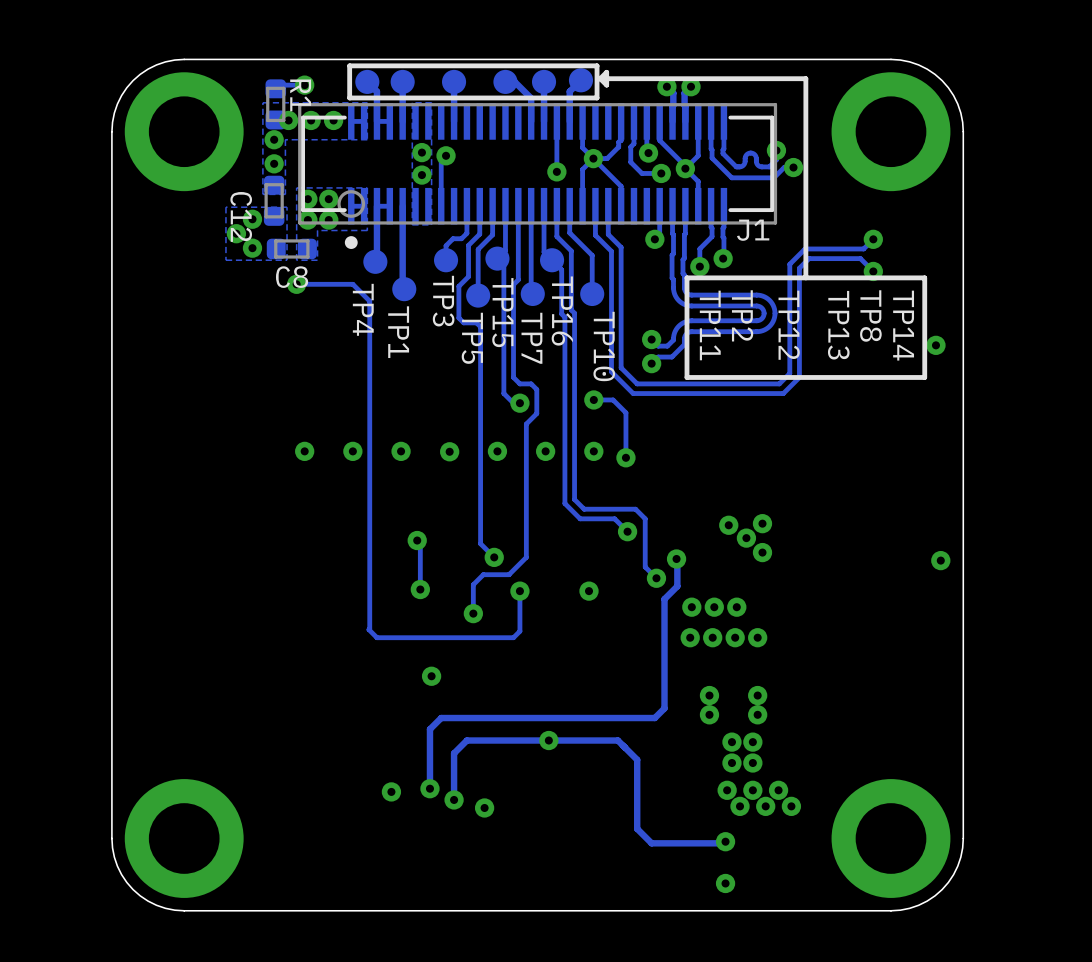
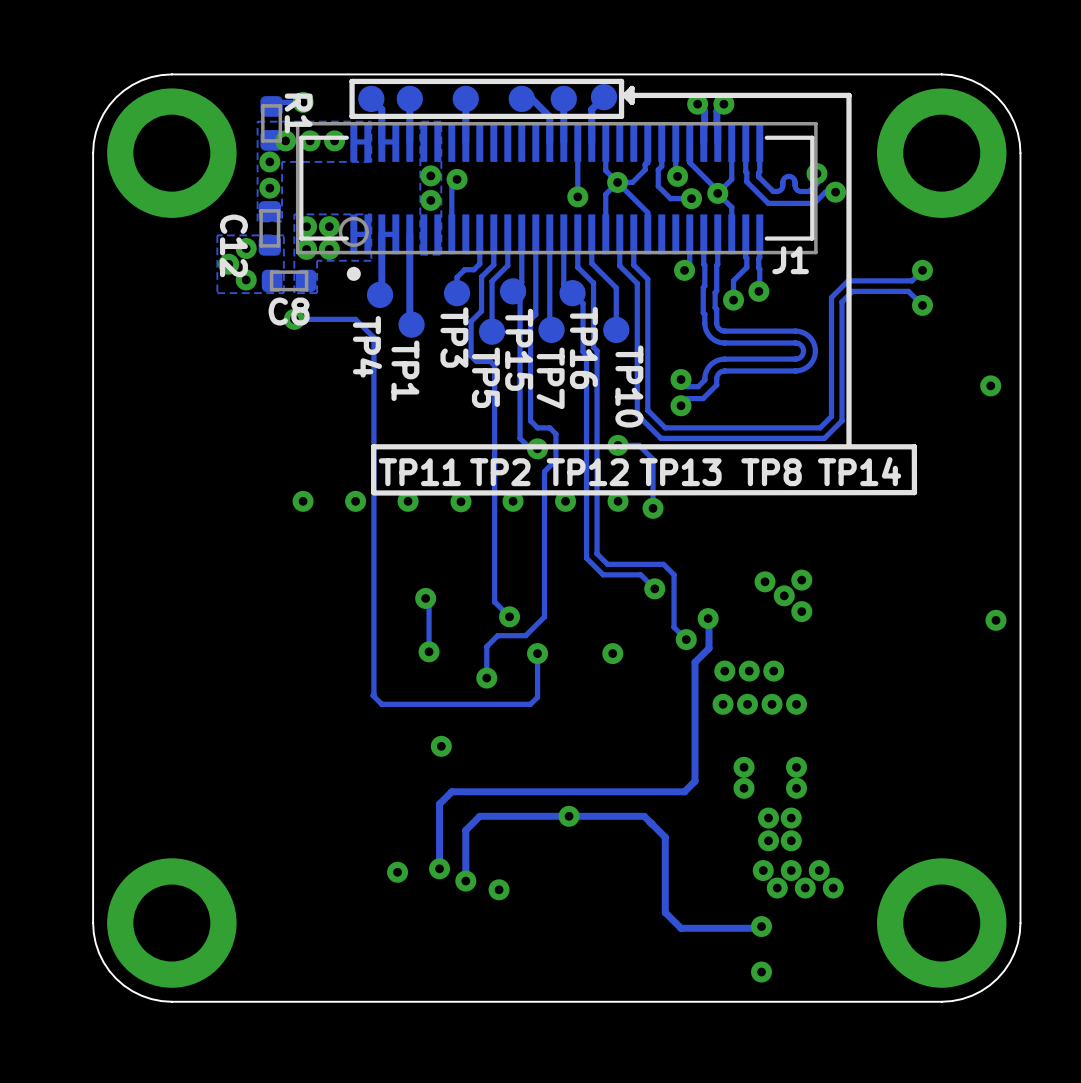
line: none -> (849, 312) (849, 445)
line: (924, 277) (686, 277) (686, 377) (924, 377) (924, 277) -> none
TP2 name rotation: 0° (742, 315) -> 90° counterclockwise (500, 472)
TP2 name position: TP2 (742, 315) -> TP2 (500, 472)
TP8 name rotation: 0° (870, 315) -> 90° counterclockwise (771, 472)
TP8 name position: TP8 (870, 315) -> TP8 (771, 472)
TP11 name rotation: 0° (710, 325) -> 90° counterclockwise (419, 472)
TP11 name position: TP11 (710, 325) -> TP11 (419, 472)
TP12 name rotation: 0° (789, 325) -> 90° counterclockwise (587, 472)
TP12 name position: TP12 (789, 325) -> TP12 (587, 472)
TP13 name rotation: 0° (838, 325) -> 90° counterclockwise (680, 472)
TP13 name position: TP13 (838, 325) -> TP13 (680, 472)
TP14 name rotation: 0° (903, 325) -> 90° counterclockwise (859, 471)
TP14 name position: TP14 (903, 325) -> TP14 (859, 471)
line: none -> (373, 492) (373, 446) (914, 446) (914, 492) (374, 493)

